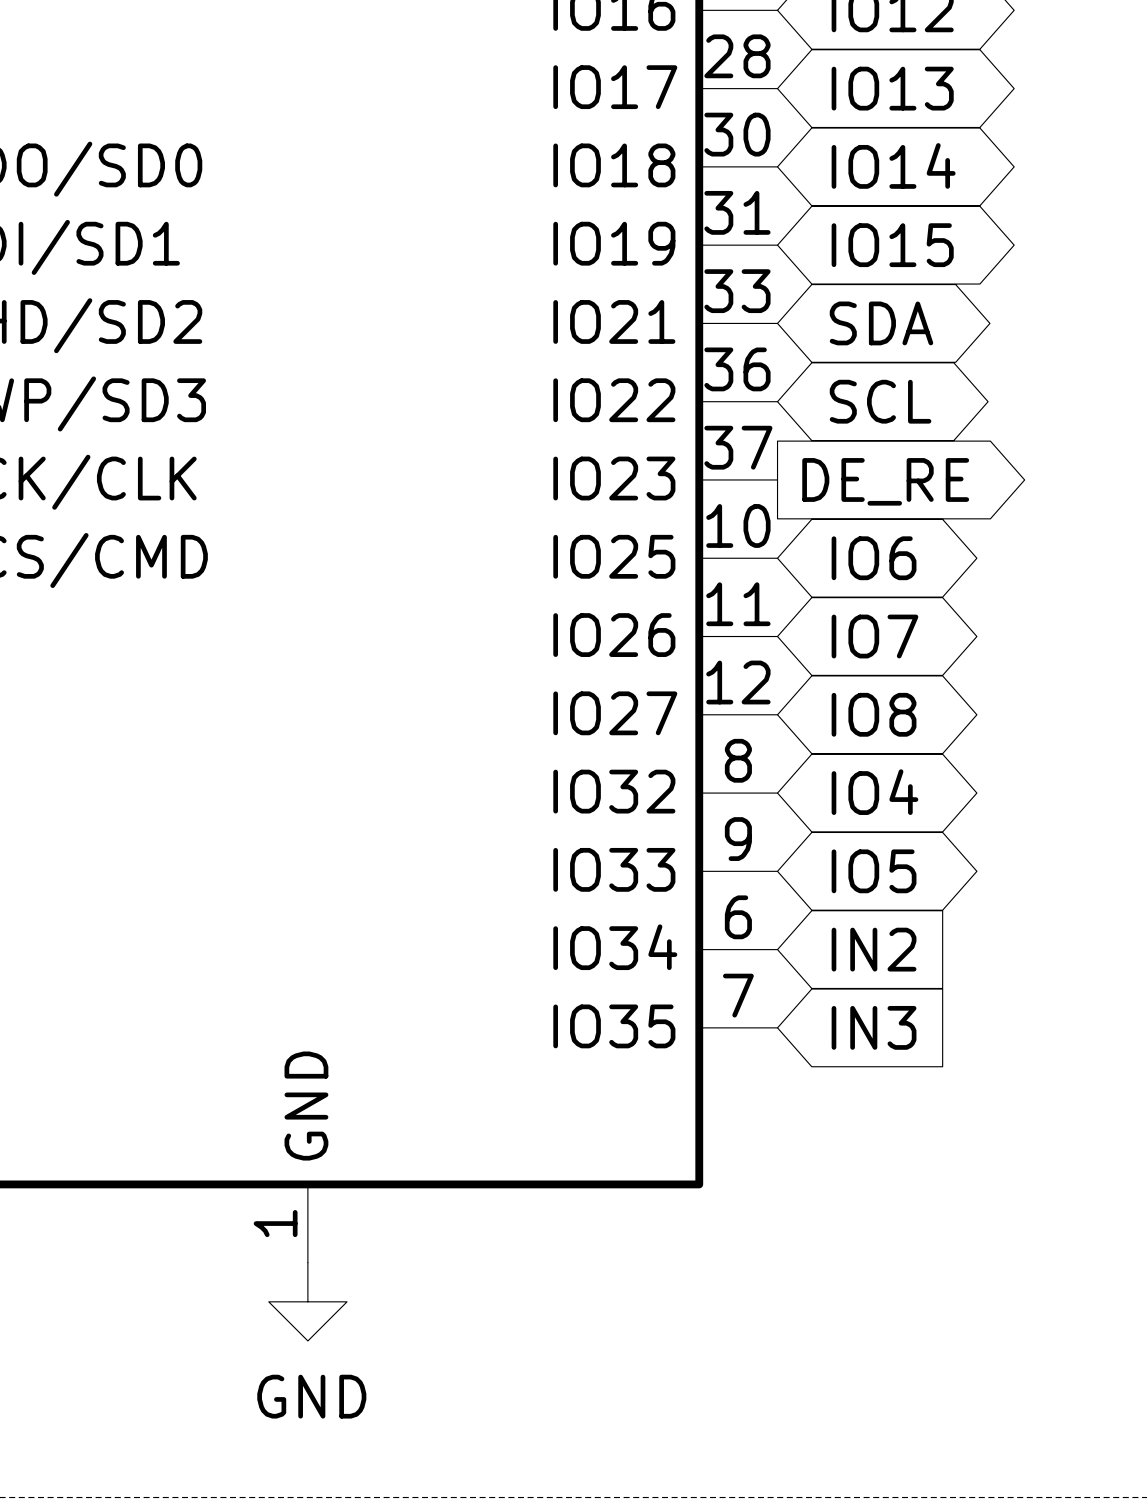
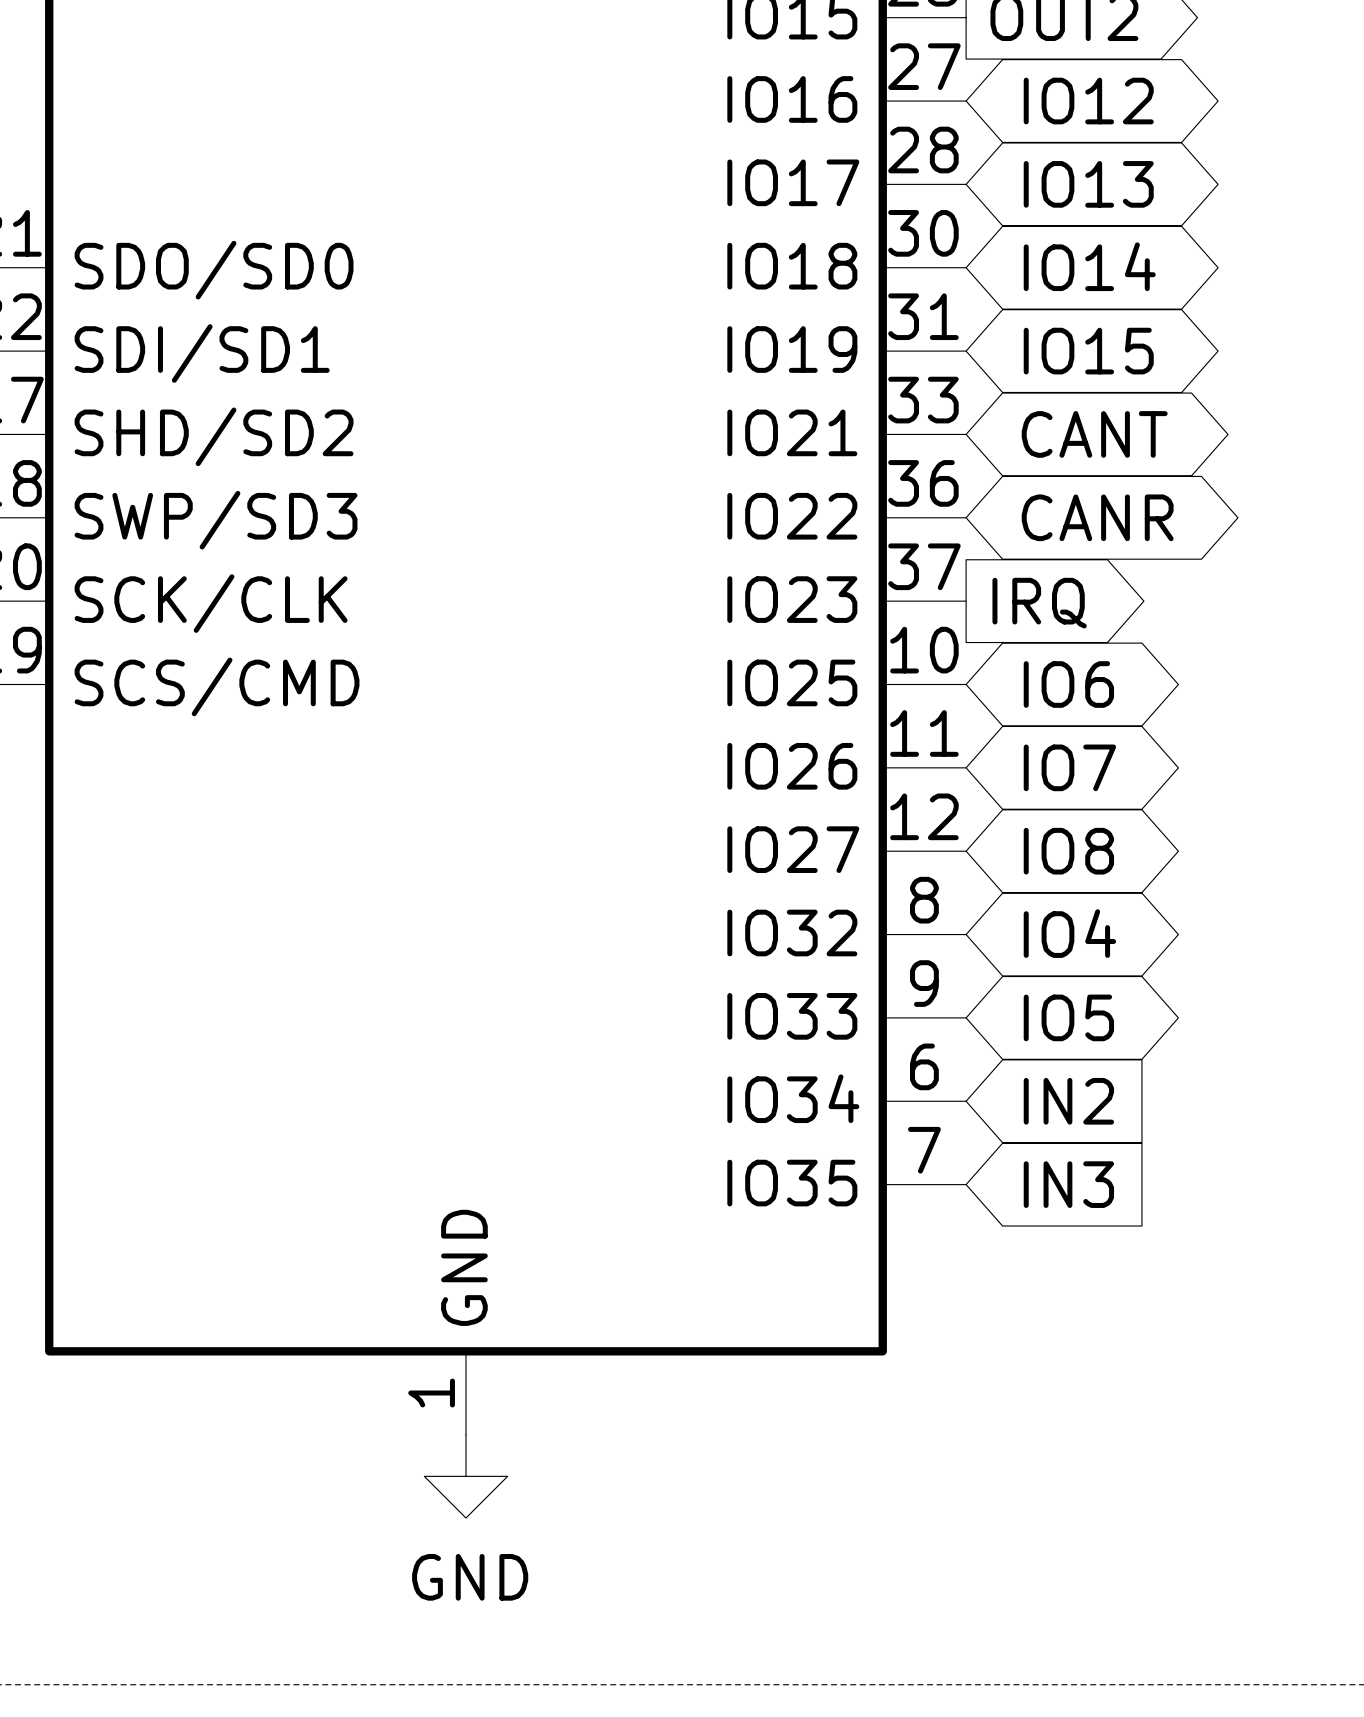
global label: SDA (881, 323) -> CANT (1094, 434)
global label: SCL (880, 401) -> CANR (1097, 517)
global label: DE_RE (885, 481) -> IRQ (1039, 603)

